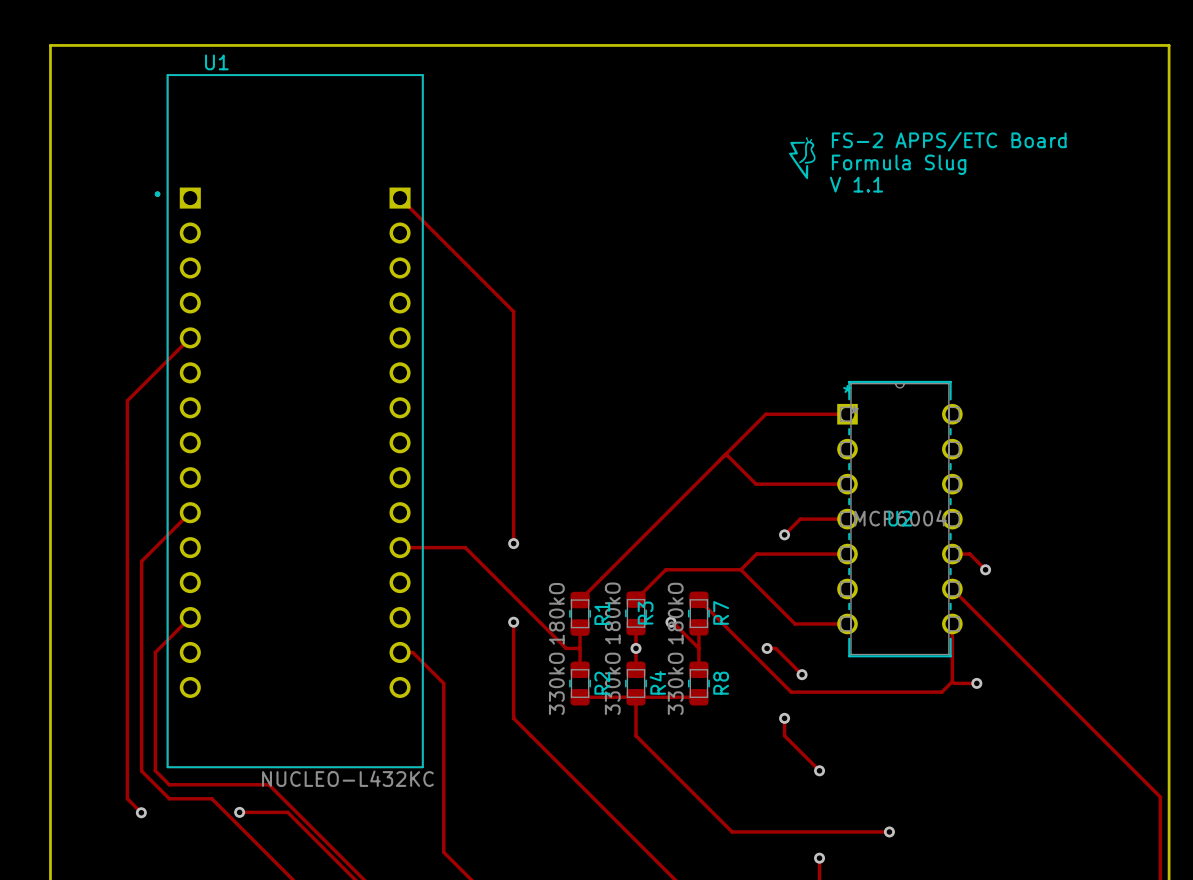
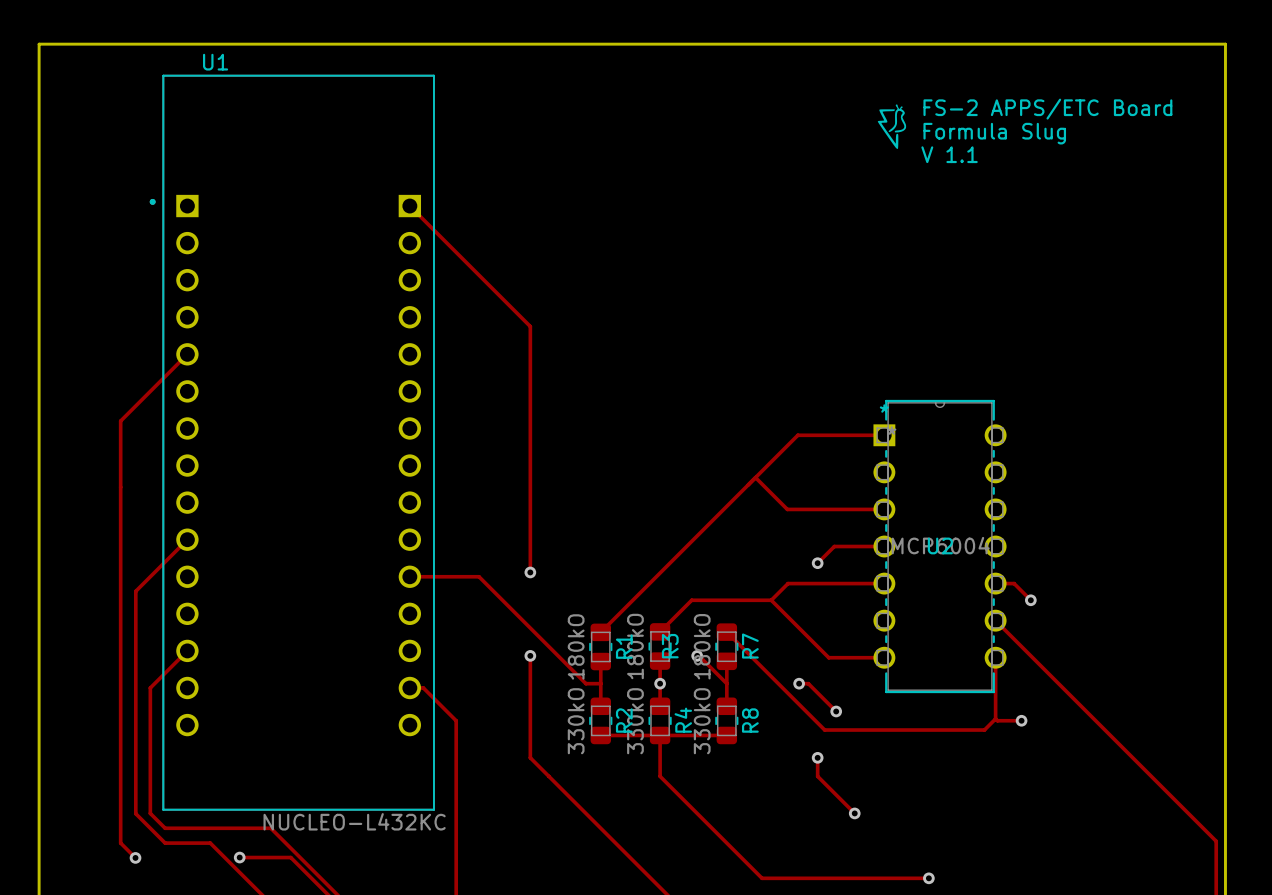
text position: FS-2 APPS/ETC Board (949, 141) -> FS-2 APPS/ETC Board (1047, 109)
drawing position: (802, 158) -> (891, 126)
text position: Formula Slug (899, 164) -> Formula Slug (994, 133)
text position: V 1.1 (856, 184) -> V 1.1 (949, 154)

